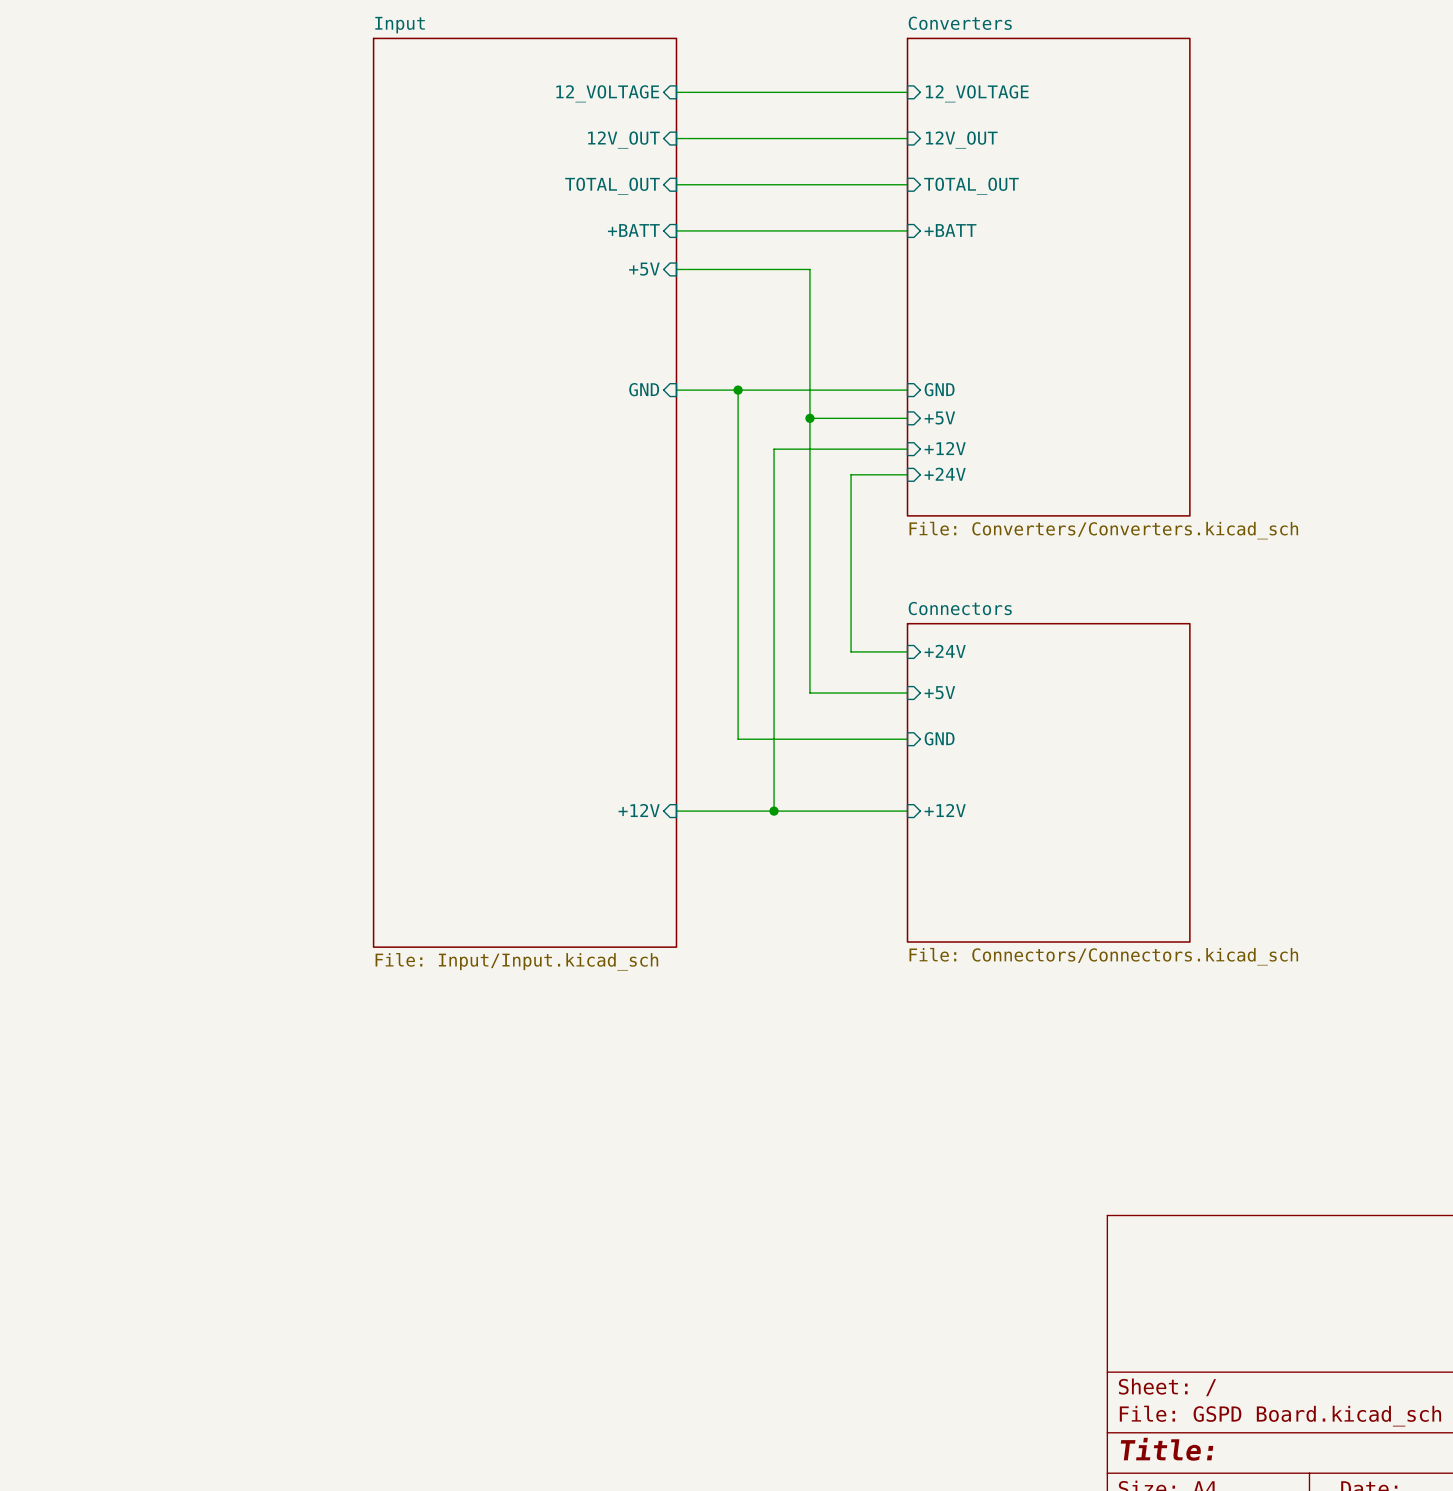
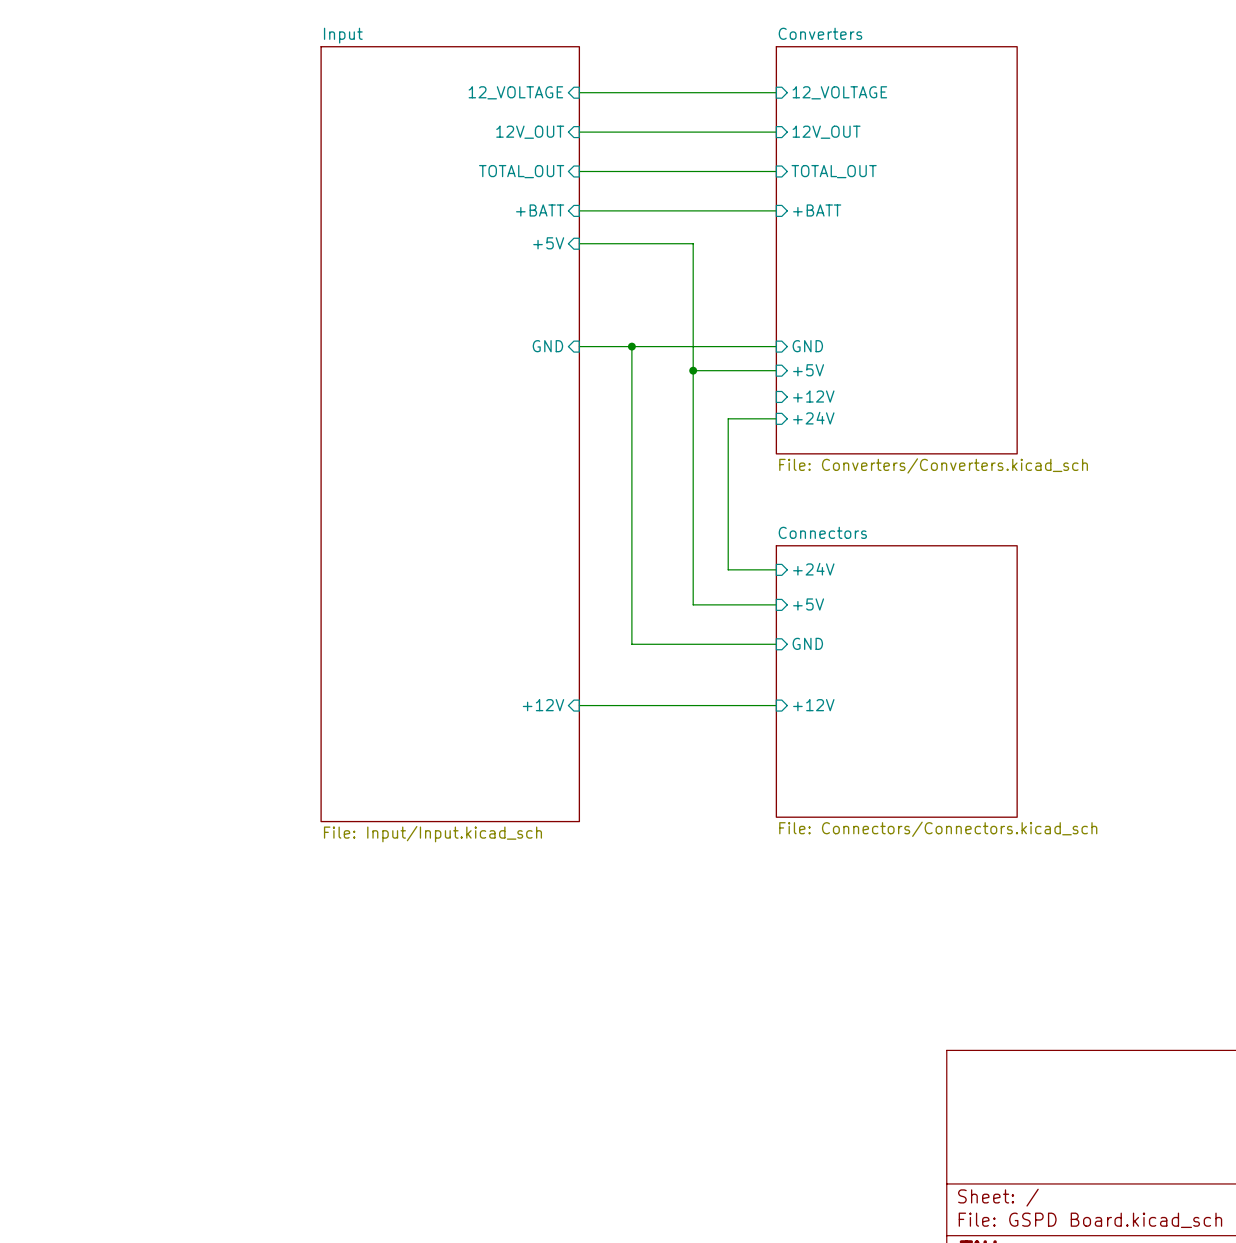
wire: (907, 449) (774, 449) (774, 811) -> none
junction: (774, 811) -> none

